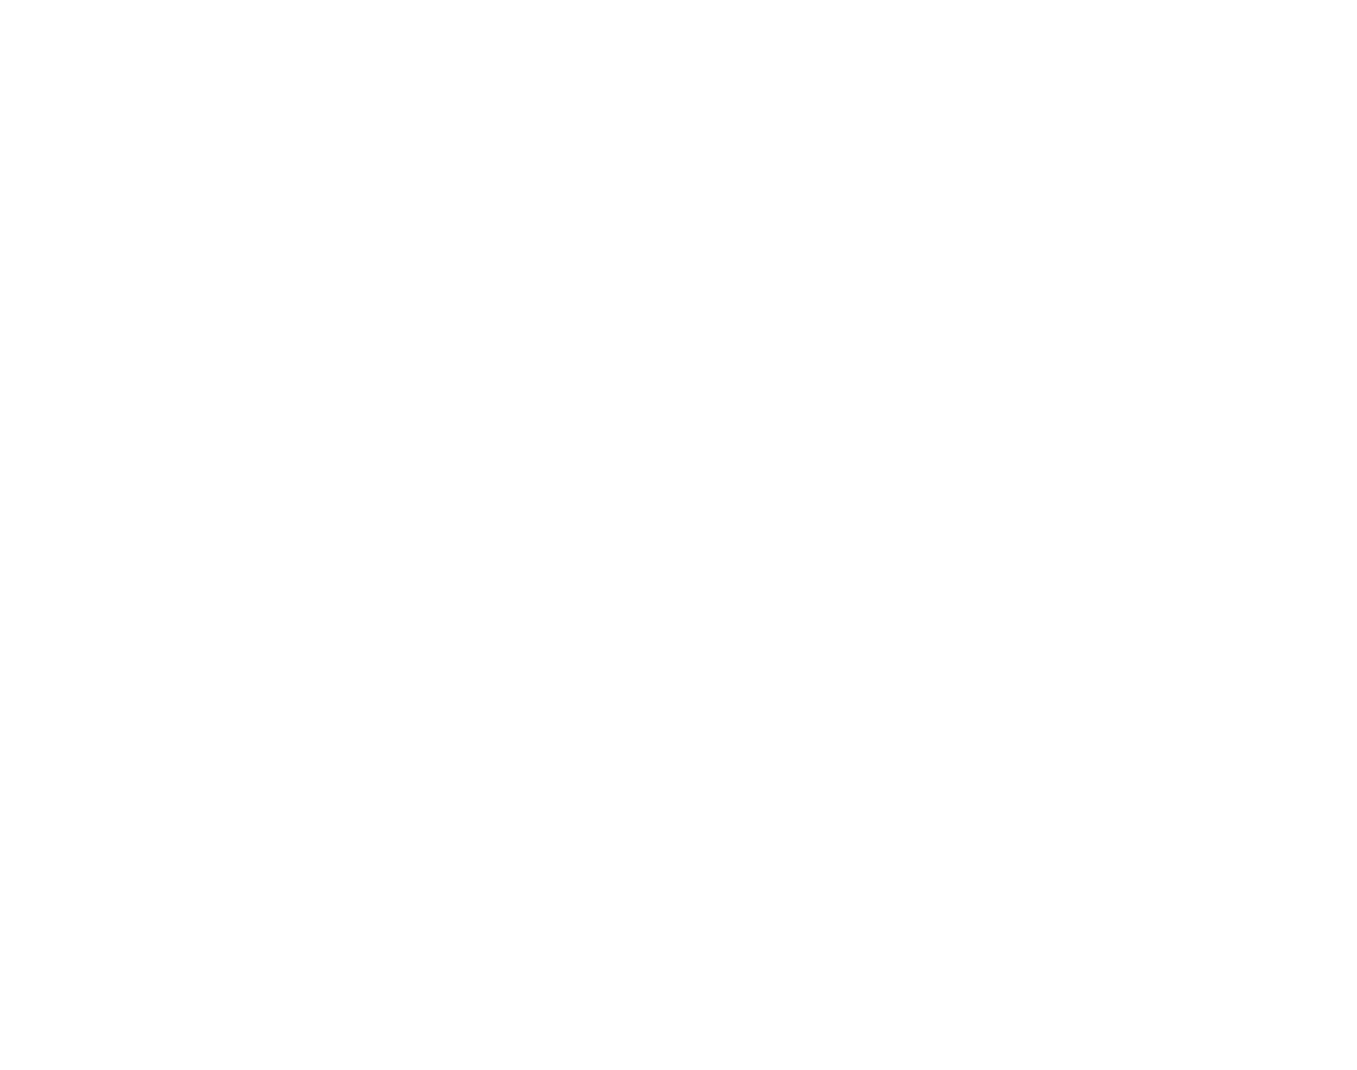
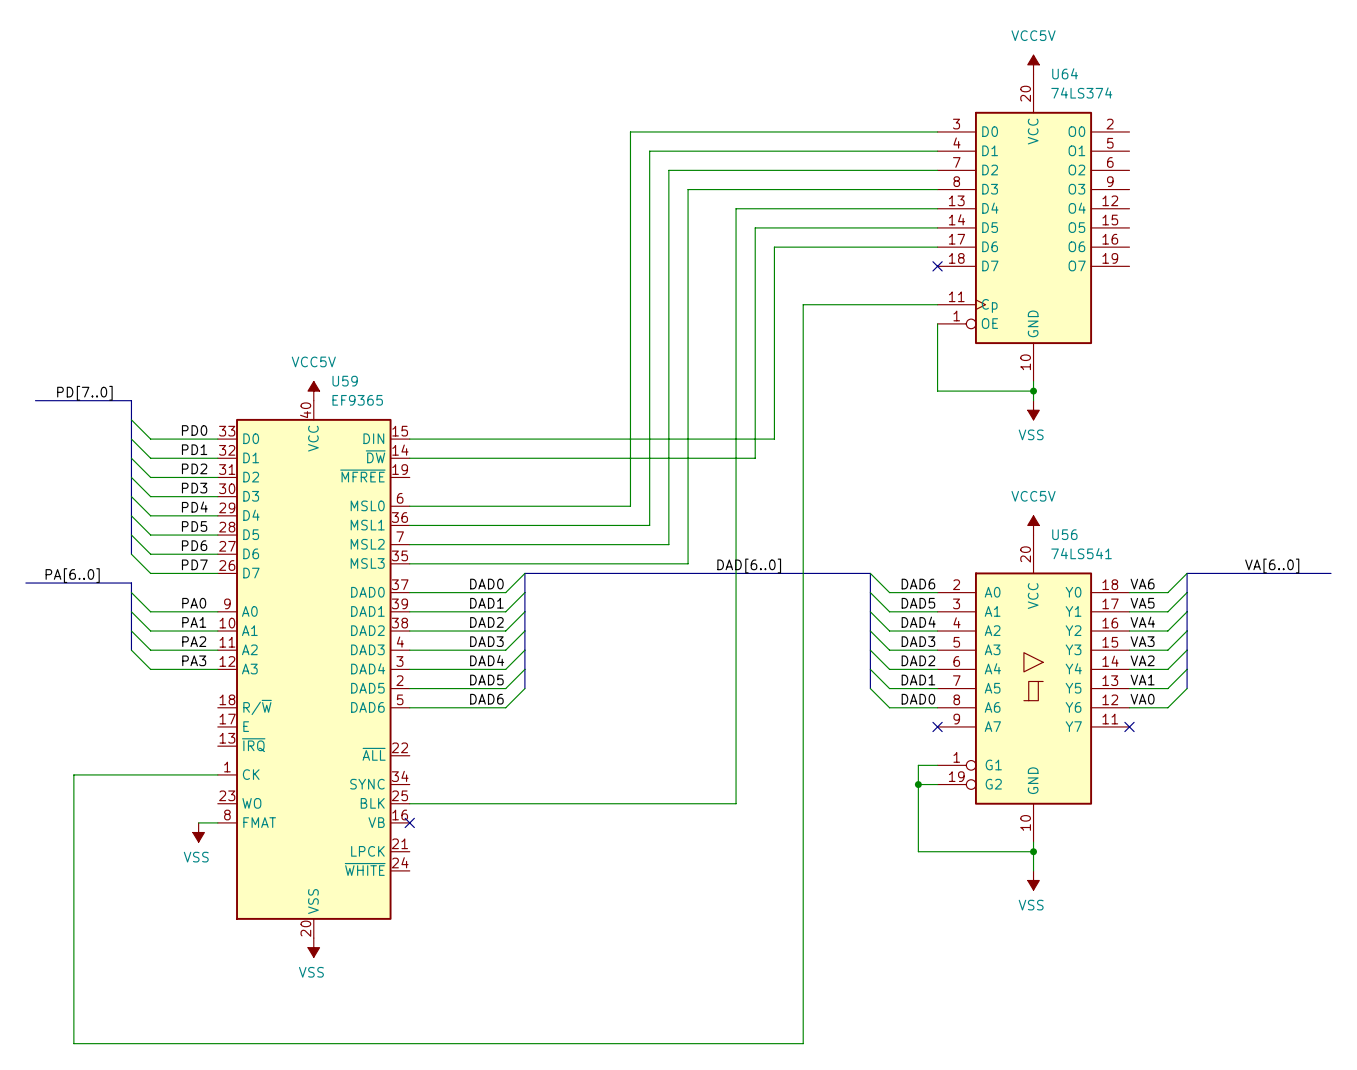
power symbol: none -> VCC5V (1033, 64)
wire: none -> (937, 131) (630, 131) (630, 506) (409, 506)
wire: none -> (937, 151) (649, 151) (649, 525) (409, 525)
wire: none -> (937, 170) (668, 170) (668, 544) (409, 544)
wire: none -> (937, 189) (688, 189) (688, 563) (409, 563)
wire: none -> (937, 208) (736, 208) (736, 803) (409, 803)
wire: none -> (937, 227) (755, 227) (755, 458) (409, 458)
U64: none -> 74LS374 (1033, 227)
wire: none -> (937, 247) (774, 247) (774, 439) (409, 439)
no-connect mark: none -> (937, 266)
wire: none -> (937, 304) (803, 304) (803, 1043) (73, 1043) (73, 774) (217, 774)
wire: none -> (937, 323) (937, 391) (1033, 391)
wire: none -> (1033, 381) (1033, 400)
power symbol: none -> VCC5V (313, 391)
junction: none -> (1033, 391)
label: none -> PD[7..0] (84, 393)
bus: none -> (35, 400) (131, 400) (131, 554)
power symbol: none -> VSS (1033, 410)
wire: none -> (131, 419) (150, 439) (217, 439)
label: none -> PD0 (194, 430)
wire: none -> (131, 439) (150, 458) (217, 458)
label: none -> PD1 (194, 449)
wire: none -> (131, 458) (150, 477) (217, 477)
label: none -> PD2 (194, 468)
wire: none -> (131, 477) (150, 496) (217, 496)
label: none -> PD3 (194, 488)
wire: none -> (131, 496) (150, 515) (217, 515)
label: none -> PD4 (194, 507)
wire: none -> (131, 515) (150, 535) (217, 535)
power symbol: none -> VCC5V (1033, 525)
label: none -> PD5 (194, 526)
wire: none -> (131, 535) (150, 554) (217, 554)
label: none -> PD6 (194, 545)
wire: none -> (131, 554) (150, 573) (217, 573)
label: none -> PD7 (194, 564)
label: none -> DAD[6..0] (749, 566)
label: none -> VA[6..0] (1272, 566)
wire: none -> (524, 573) (505, 592) (409, 592)
wire: none -> (870, 573) (889, 592) (937, 592)
wire: none -> (1187, 573) (1167, 592) (1129, 592)
bus: none -> (1331, 573) (1187, 573) (1187, 688)
label: none -> PA[6..0] (72, 575)
bus: none -> (25, 583) (131, 583) (131, 650)
label: none -> DAD0 (486, 584)
label: none -> DAD6 (918, 584)
label: none -> VA6 (1142, 584)
wire: none -> (131, 592) (150, 611) (217, 611)
wire: none -> (524, 592) (505, 611) (409, 611)
wire: none -> (870, 592) (889, 611) (937, 611)
wire: none -> (1187, 592) (1167, 611) (1129, 611)
label: none -> PA0 (194, 603)
label: none -> DAD1 (486, 603)
label: none -> DAD5 (918, 603)
label: none -> VA5 (1142, 603)
wire: none -> (131, 611) (150, 631) (217, 631)
wire: none -> (524, 611) (505, 631) (409, 631)
wire: none -> (870, 611) (889, 631) (937, 631)
wire: none -> (1187, 611) (1167, 631) (1129, 631)
label: none -> PA1 (194, 622)
label: none -> DAD2 (486, 622)
label: none -> DAD4 (918, 622)
label: none -> VA4 (1142, 622)
wire: none -> (131, 631) (150, 650) (217, 650)
wire: none -> (524, 631) (505, 650) (409, 650)
wire: none -> (870, 631) (889, 650) (937, 650)
wire: none -> (1187, 631) (1167, 650) (1129, 650)
label: none -> PA2 (194, 641)
label: none -> DAD3 (486, 641)
label: none -> DAD3 (918, 641)
label: none -> VA3 (1142, 641)
wire: none -> (131, 650) (150, 669) (217, 669)
wire: none -> (524, 650) (505, 669) (409, 669)
wire: none -> (870, 650) (889, 669) (937, 669)
wire: none -> (1187, 650) (1167, 669) (1129, 669)
label: none -> PA3 (194, 660)
label: none -> DAD4 (487, 660)
label: none -> DAD2 (918, 660)
label: none -> VA2 (1142, 660)
U59: none -> EF9365 (313, 669)
wire: none -> (524, 669) (505, 688) (409, 688)
wire: none -> (870, 669) (889, 688) (937, 688)
wire: none -> (1187, 669) (1167, 688) (1129, 688)
label: none -> DAD5 (486, 680)
label: none -> DAD1 (918, 680)
label: none -> VA1 (1142, 680)
wire: none -> (524, 688) (505, 707) (409, 707)
bus: none -> (524, 688) (524, 573) (870, 573) (870, 688)
wire: none -> (870, 688) (889, 707) (937, 707)
U56: none -> 74LS541 (1033, 688)
wire: none -> (1187, 688) (1167, 707) (1129, 707)
label: none -> DAD6 (486, 699)
label: none -> DAD0 (918, 699)
label: none -> VA0 (1142, 699)
no-connect mark: none -> (937, 726)
no-connect mark: none -> (1129, 726)
wire: none -> (937, 765) (918, 765) (918, 851) (1033, 851)
wire: none -> (918, 784) (937, 784)
junction: none -> (918, 784)
wire: none -> (198, 822) (217, 822)
no-connect mark: none -> (409, 822)
power symbol: none -> VSS (198, 832)
wire: none -> (1033, 842) (1033, 870)
junction: none -> (1033, 851)
power symbol: none -> VSS (1033, 880)
power symbol: none -> VSS (313, 947)

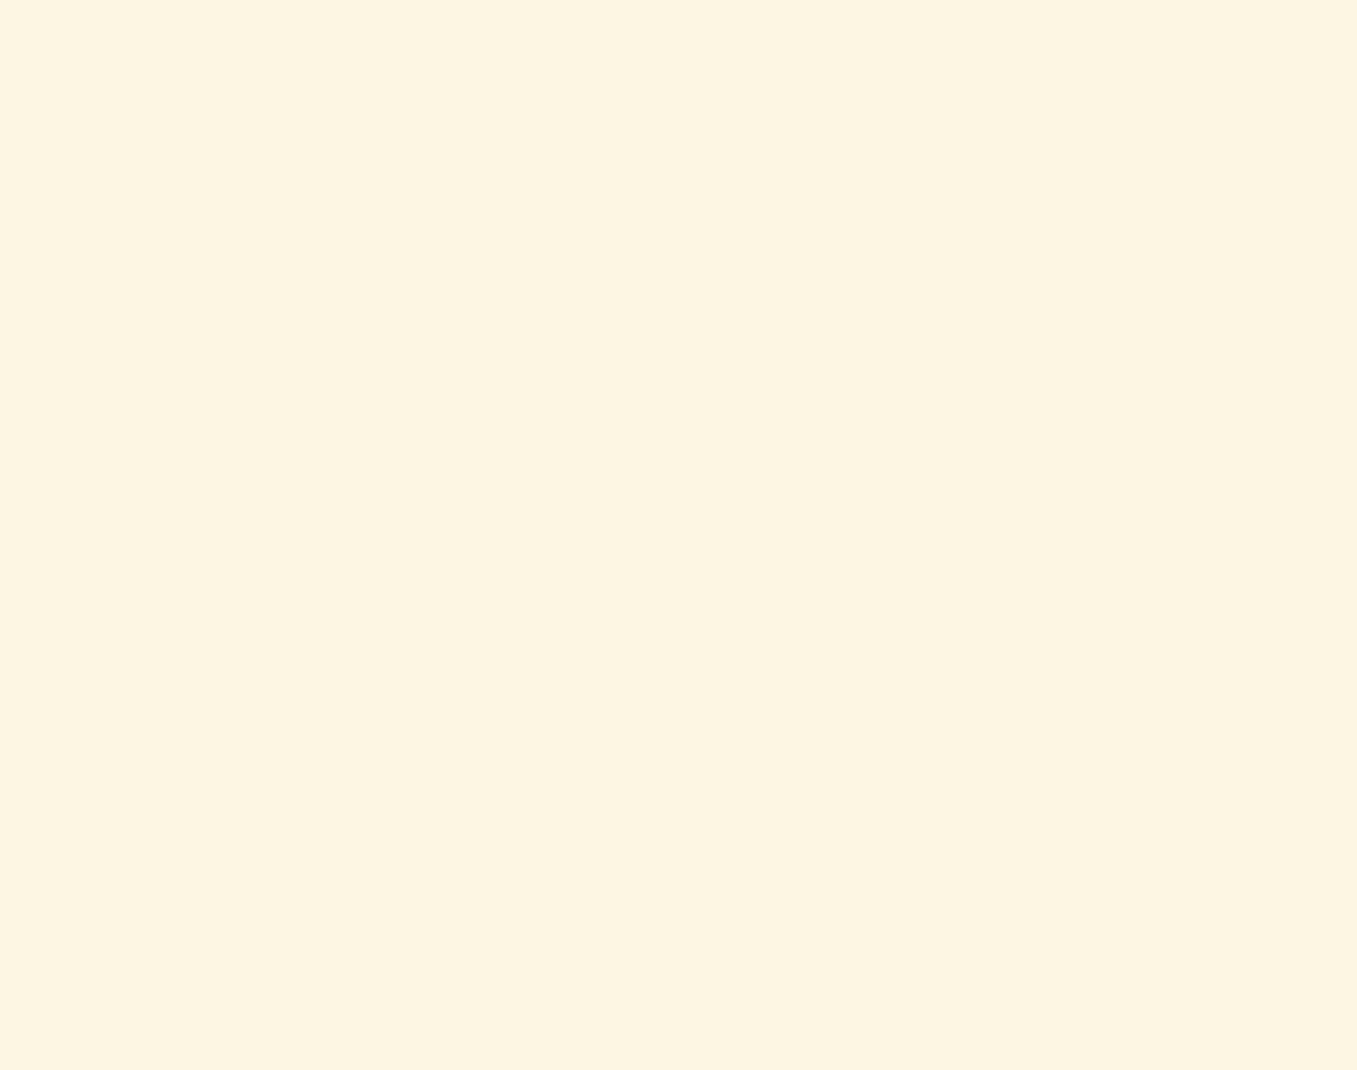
power symbol: VCC5V (1033, 64) -> none
wire: (937, 131) (630, 131) (630, 506) (409, 506) -> none
wire: (937, 151) (649, 151) (649, 525) (409, 525) -> none
wire: (937, 170) (668, 170) (668, 544) (409, 544) -> none
wire: (937, 189) (688, 189) (688, 563) (409, 563) -> none
wire: (937, 208) (736, 208) (736, 803) (409, 803) -> none
wire: (937, 227) (755, 227) (755, 458) (409, 458) -> none
U64: 74LS374 (1033, 227) -> none
wire: (937, 247) (774, 247) (774, 439) (409, 439) -> none
no-connect mark: (937, 266) -> none
wire: (937, 304) (803, 304) (803, 1043) (73, 1043) (73, 774) (217, 774) -> none
wire: (937, 323) (937, 391) (1033, 391) -> none
wire: (1033, 381) (1033, 400) -> none
power symbol: VCC5V (313, 391) -> none
junction: (1033, 391) -> none
label: PD[7..0] (84, 393) -> none
bus: (35, 400) (131, 400) (131, 554) -> none
power symbol: VSS (1033, 410) -> none
wire: (131, 419) (150, 439) (217, 439) -> none
label: PD0 (194, 430) -> none
wire: (131, 439) (150, 458) (217, 458) -> none
label: PD1 (194, 449) -> none
wire: (131, 458) (150, 477) (217, 477) -> none
label: PD2 (194, 468) -> none
wire: (131, 477) (150, 496) (217, 496) -> none
label: PD3 (194, 488) -> none
wire: (131, 496) (150, 515) (217, 515) -> none
label: PD4 (194, 507) -> none
wire: (131, 515) (150, 535) (217, 535) -> none
power symbol: VCC5V (1033, 525) -> none
label: PD5 (194, 526) -> none
wire: (131, 535) (150, 554) (217, 554) -> none
label: PD6 (194, 545) -> none
wire: (131, 554) (150, 573) (217, 573) -> none
label: PD7 (194, 564) -> none
label: DAD[6..0] (749, 566) -> none
label: VA[6..0] (1272, 566) -> none
wire: (524, 573) (505, 592) (409, 592) -> none
wire: (870, 573) (889, 592) (937, 592) -> none
wire: (1187, 573) (1167, 592) (1129, 592) -> none
bus: (1331, 573) (1187, 573) (1187, 688) -> none
label: PA[6..0] (72, 575) -> none
bus: (25, 583) (131, 583) (131, 650) -> none
label: DAD0 (486, 584) -> none
label: DAD6 (918, 584) -> none
label: VA6 (1142, 584) -> none
wire: (131, 592) (150, 611) (217, 611) -> none
wire: (524, 592) (505, 611) (409, 611) -> none
wire: (870, 592) (889, 611) (937, 611) -> none
wire: (1187, 592) (1167, 611) (1129, 611) -> none
label: PA0 (194, 603) -> none
label: DAD1 (486, 603) -> none
label: DAD5 (918, 603) -> none
label: VA5 (1142, 603) -> none
wire: (131, 611) (150, 631) (217, 631) -> none
wire: (524, 611) (505, 631) (409, 631) -> none
wire: (870, 611) (889, 631) (937, 631) -> none
wire: (1187, 611) (1167, 631) (1129, 631) -> none
label: PA1 (194, 622) -> none
label: DAD2 (486, 622) -> none
label: DAD4 (918, 622) -> none
label: VA4 (1142, 622) -> none
wire: (131, 631) (150, 650) (217, 650) -> none
wire: (524, 631) (505, 650) (409, 650) -> none
wire: (870, 631) (889, 650) (937, 650) -> none
wire: (1187, 631) (1167, 650) (1129, 650) -> none
label: PA2 (194, 641) -> none
label: DAD3 (486, 641) -> none
label: DAD3 (918, 641) -> none
label: VA3 (1142, 641) -> none
wire: (131, 650) (150, 669) (217, 669) -> none
wire: (524, 650) (505, 669) (409, 669) -> none
wire: (870, 650) (889, 669) (937, 669) -> none
wire: (1187, 650) (1167, 669) (1129, 669) -> none
label: PA3 (194, 660) -> none
label: DAD4 (487, 660) -> none
label: DAD2 (918, 660) -> none
label: VA2 (1142, 660) -> none
U59: EF9365 (313, 669) -> none
wire: (524, 669) (505, 688) (409, 688) -> none
wire: (870, 669) (889, 688) (937, 688) -> none
wire: (1187, 669) (1167, 688) (1129, 688) -> none
label: DAD5 (486, 680) -> none
label: DAD1 (918, 680) -> none
label: VA1 (1142, 680) -> none
wire: (524, 688) (505, 707) (409, 707) -> none
bus: (524, 688) (524, 573) (870, 573) (870, 688) -> none
wire: (870, 688) (889, 707) (937, 707) -> none
U56: 74LS541 (1033, 688) -> none
wire: (1187, 688) (1167, 707) (1129, 707) -> none
label: DAD6 (486, 699) -> none
label: DAD0 (918, 699) -> none
label: VA0 (1142, 699) -> none
no-connect mark: (937, 726) -> none
no-connect mark: (1129, 726) -> none
wire: (937, 765) (918, 765) (918, 851) (1033, 851) -> none
wire: (918, 784) (937, 784) -> none
junction: (918, 784) -> none
wire: (198, 822) (217, 822) -> none
no-connect mark: (409, 822) -> none
power symbol: VSS (198, 832) -> none
wire: (1033, 842) (1033, 870) -> none
junction: (1033, 851) -> none
power symbol: VSS (1033, 880) -> none
power symbol: VSS (313, 947) -> none

